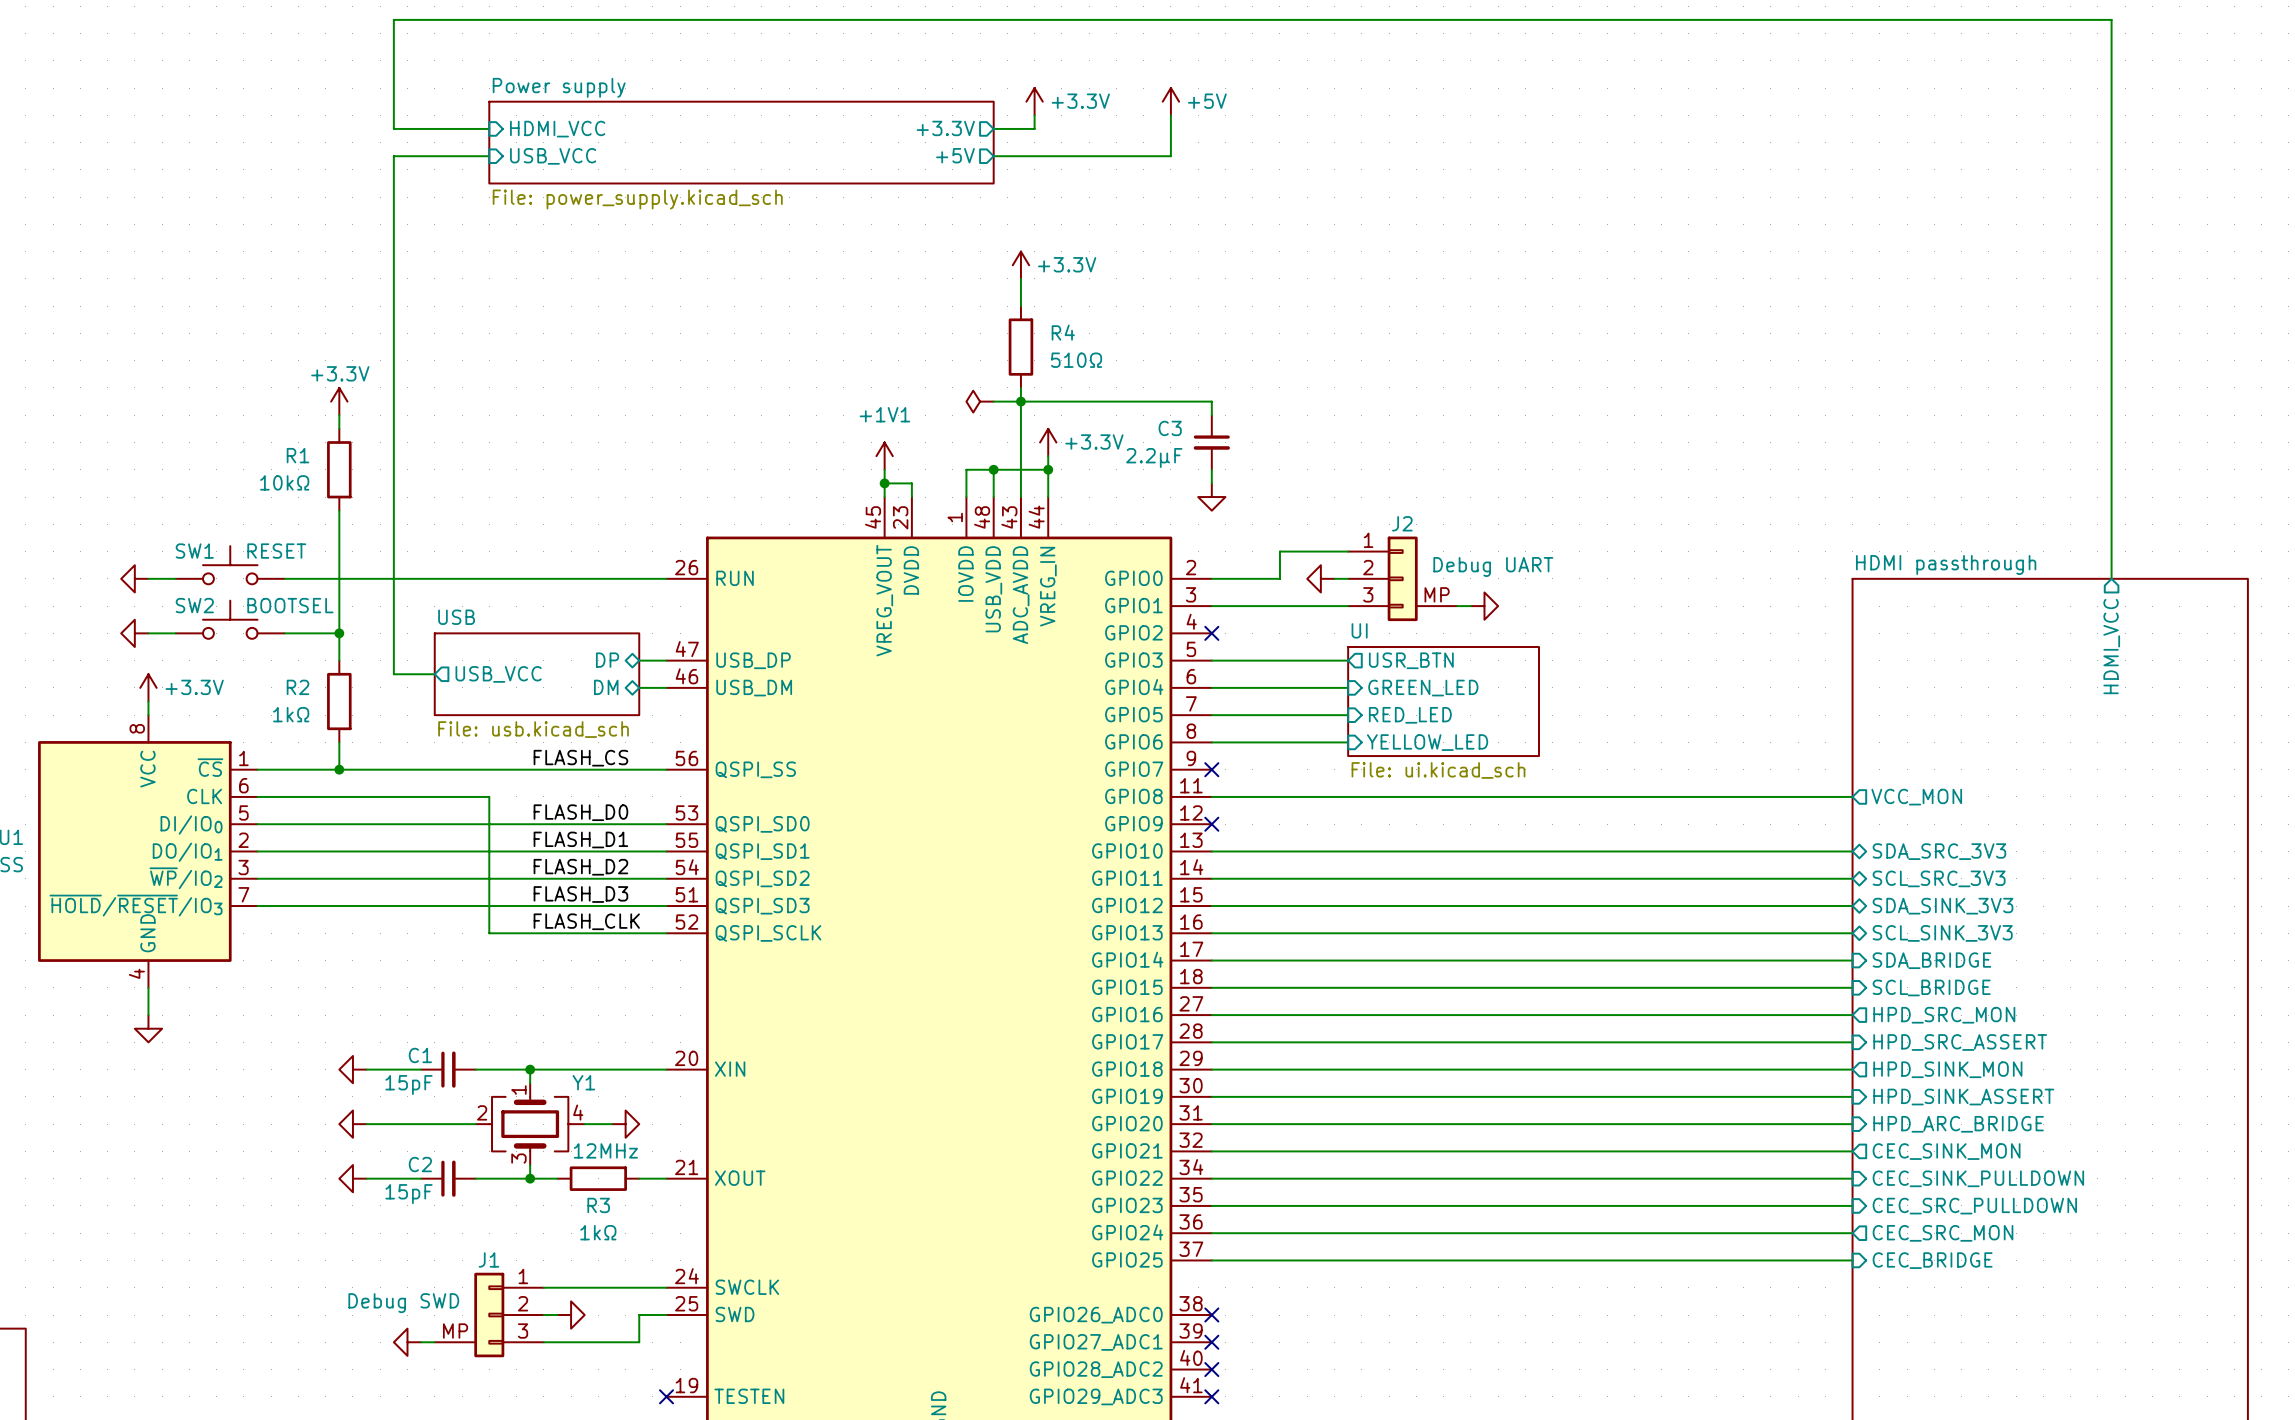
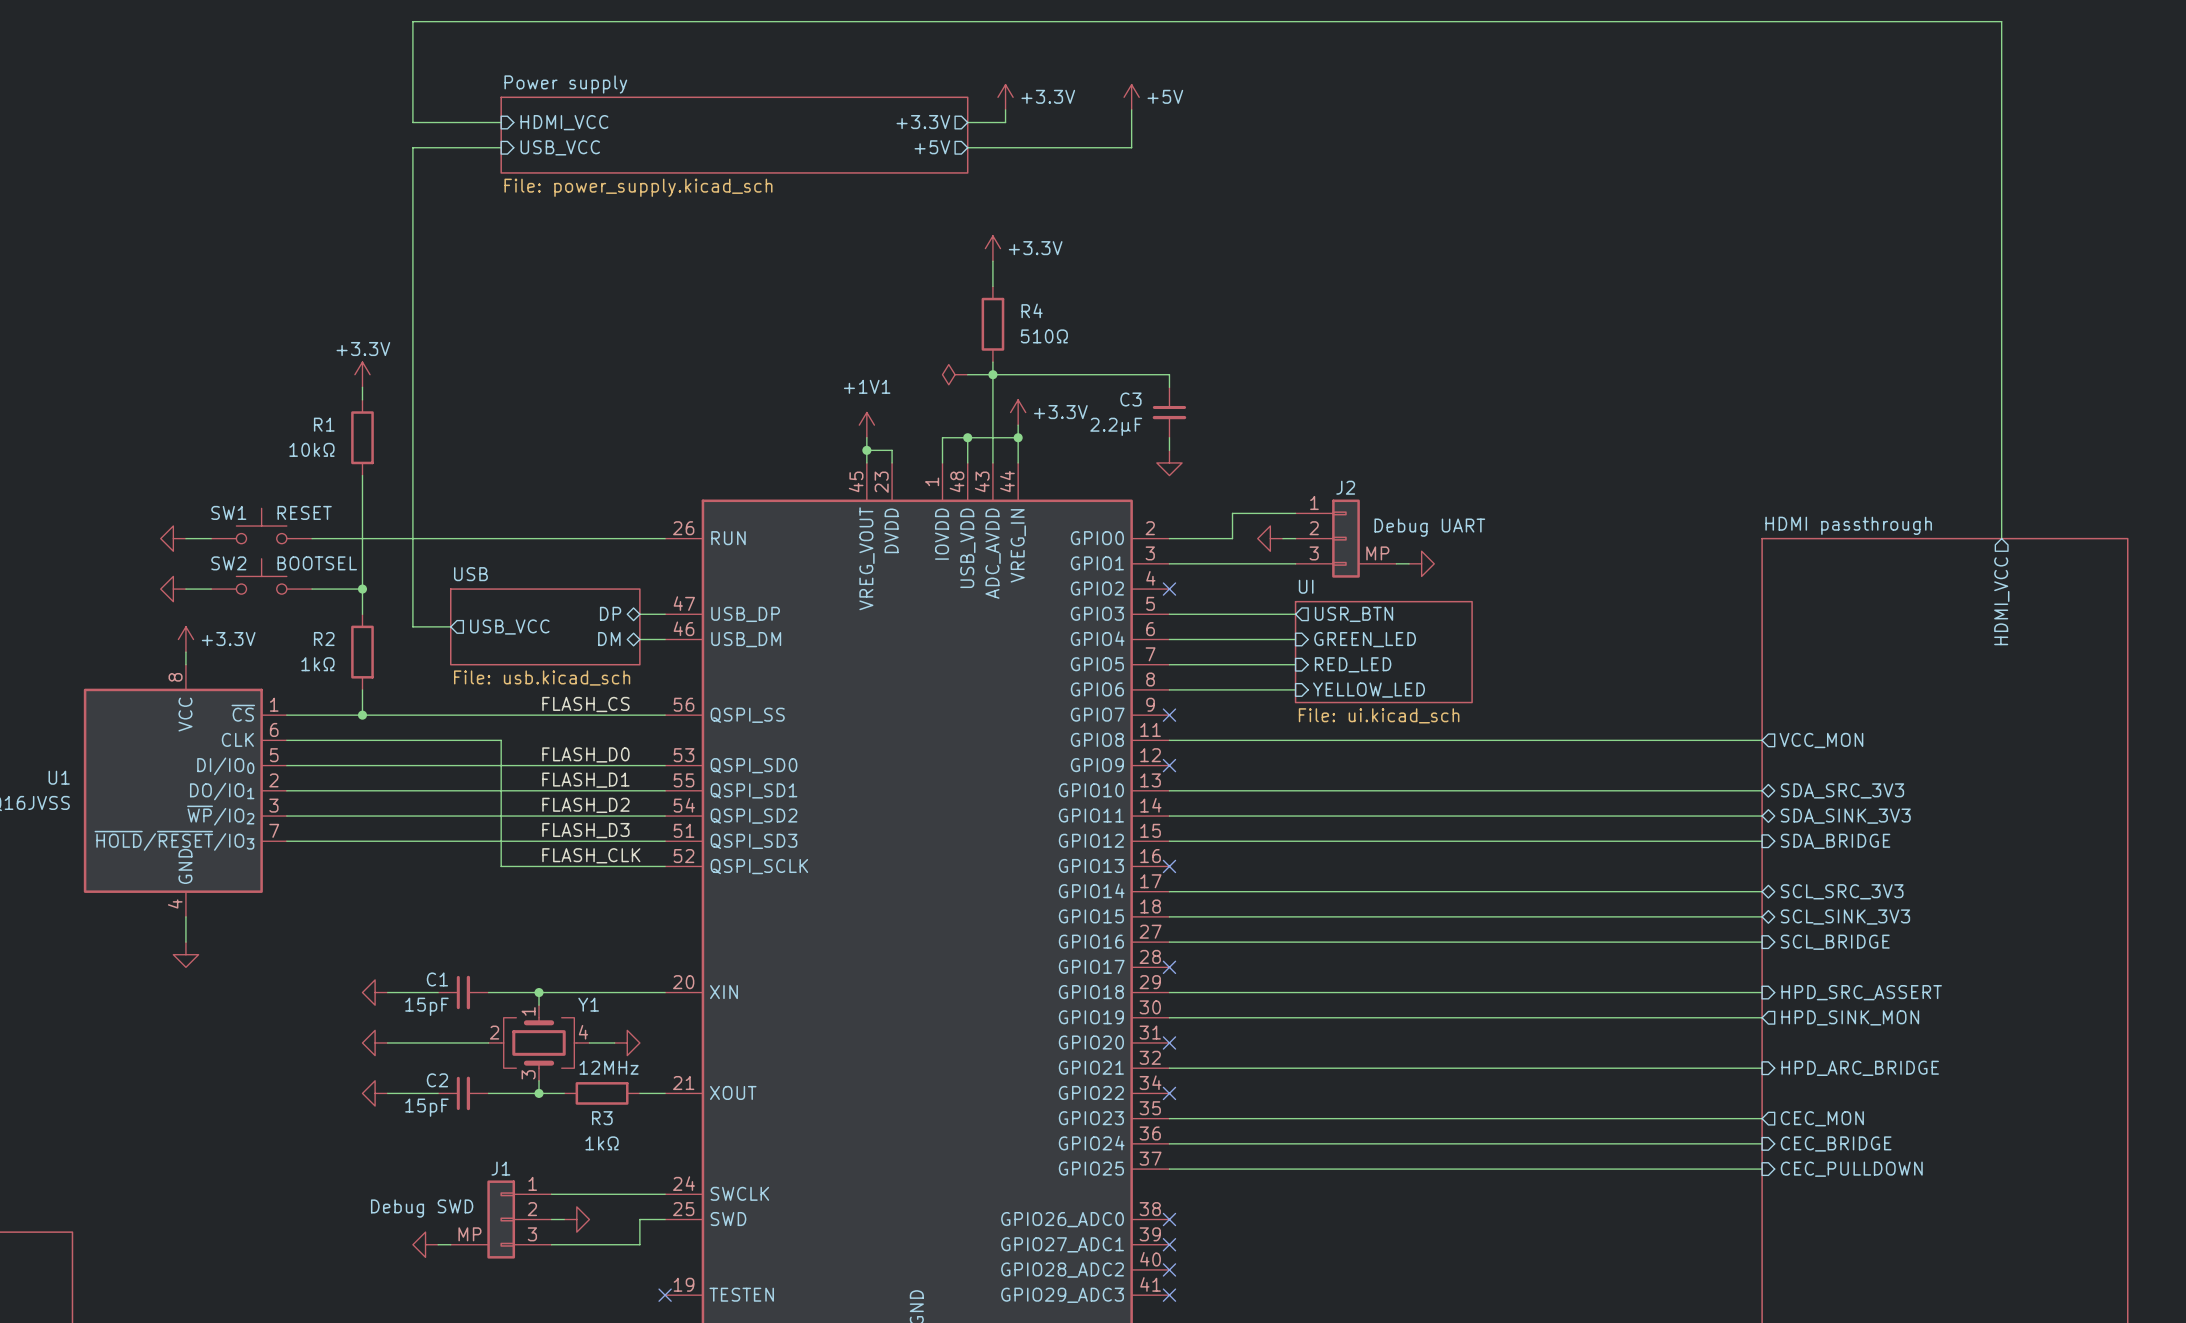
sheet pin: SCL_SRC_3V3 (1939, 878) -> SDA_SINK_3V3 (1845, 816)
sheet pin shape: bidirectional (1943, 906) -> input (1835, 841)
sheet pin: SDA_SINK_3V3 (1943, 906) -> SDA_BRIDGE (1835, 841)
wire: (1211, 933) (1852, 933) -> none
no-connect mark: none -> (1169, 866)
sheet pin: SCL_SINK_3V3 (1942, 933) -> none
sheet pin shape: input (1931, 960) -> bidirectional (1842, 891)
sheet pin: SDA_BRIDGE (1931, 960) -> SCL_SRC_3V3 (1842, 891)
sheet pin shape: input (1931, 987) -> bidirectional (1845, 917)
sheet pin: SCL_BRIDGE (1931, 987) -> SCL_SINK_3V3 (1845, 917)
sheet pin shape: output (1944, 1015) -> input (1835, 942)
sheet pin: HPD_SRC_MON (1944, 1015) -> SCL_BRIDGE (1835, 942)
wire: (1211, 1042) (1852, 1042) -> none
no-connect mark: none -> (1169, 967)
sheet pin: HPD_SRC_ASSERT (1960, 1042) -> none
sheet pin shape: output (1947, 1069) -> input (1861, 992)
sheet pin: HPD_SINK_MON (1947, 1069) -> HPD_SRC_ASSERT (1861, 992)
sheet pin shape: input (1963, 1097) -> output (1850, 1017)
sheet pin: HPD_SINK_ASSERT (1963, 1097) -> HPD_SINK_MON (1850, 1017)
wire: (1211, 1124) (1852, 1124) -> none
no-connect mark: none -> (1169, 1042)
sheet pin: HPD_ARC_BRIDGE (1958, 1124) -> none
sheet pin shape: output (1946, 1151) -> input (1860, 1068)
sheet pin: CEC_SINK_MON (1946, 1151) -> HPD_ARC_BRIDGE (1860, 1068)
wire: (1211, 1178) (1852, 1178) -> none
no-connect mark: none -> (1169, 1093)
sheet pin: CEC_SINK_PULLDOWN (1978, 1178) -> none
sheet pin shape: input (1974, 1206) -> output (1822, 1118)
sheet pin: CEC_SRC_PULLDOWN (1974, 1206) -> CEC_MON (1822, 1118)
sheet pin shape: output (1943, 1233) -> input (1836, 1143)
sheet pin: CEC_SRC_MON (1943, 1233) -> CEC_BRIDGE (1836, 1143)
sheet pin: CEC_BRIDGE (1932, 1260) -> CEC_PULLDOWN (1851, 1169)

